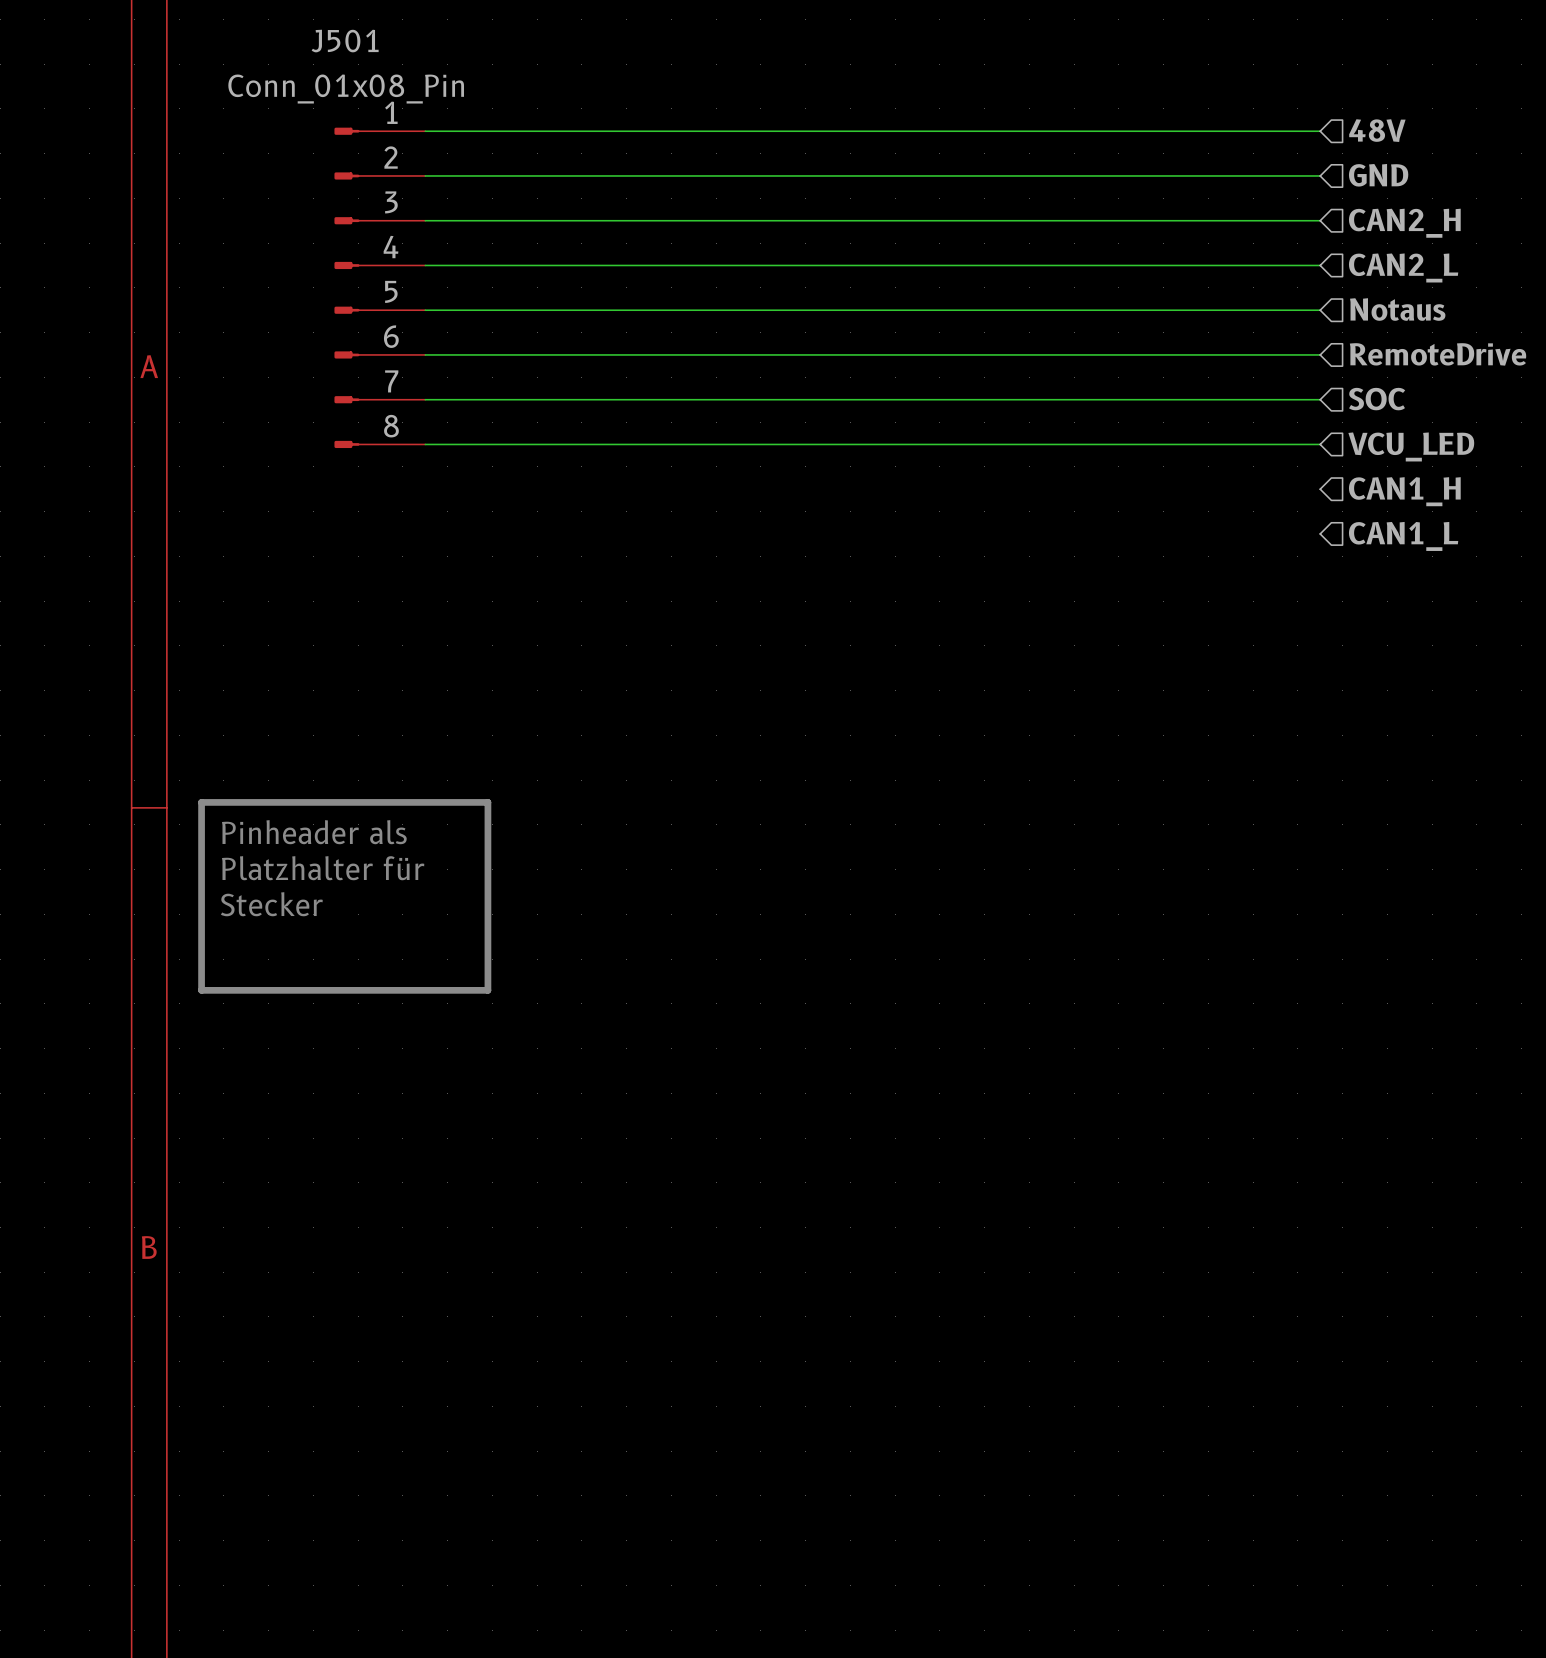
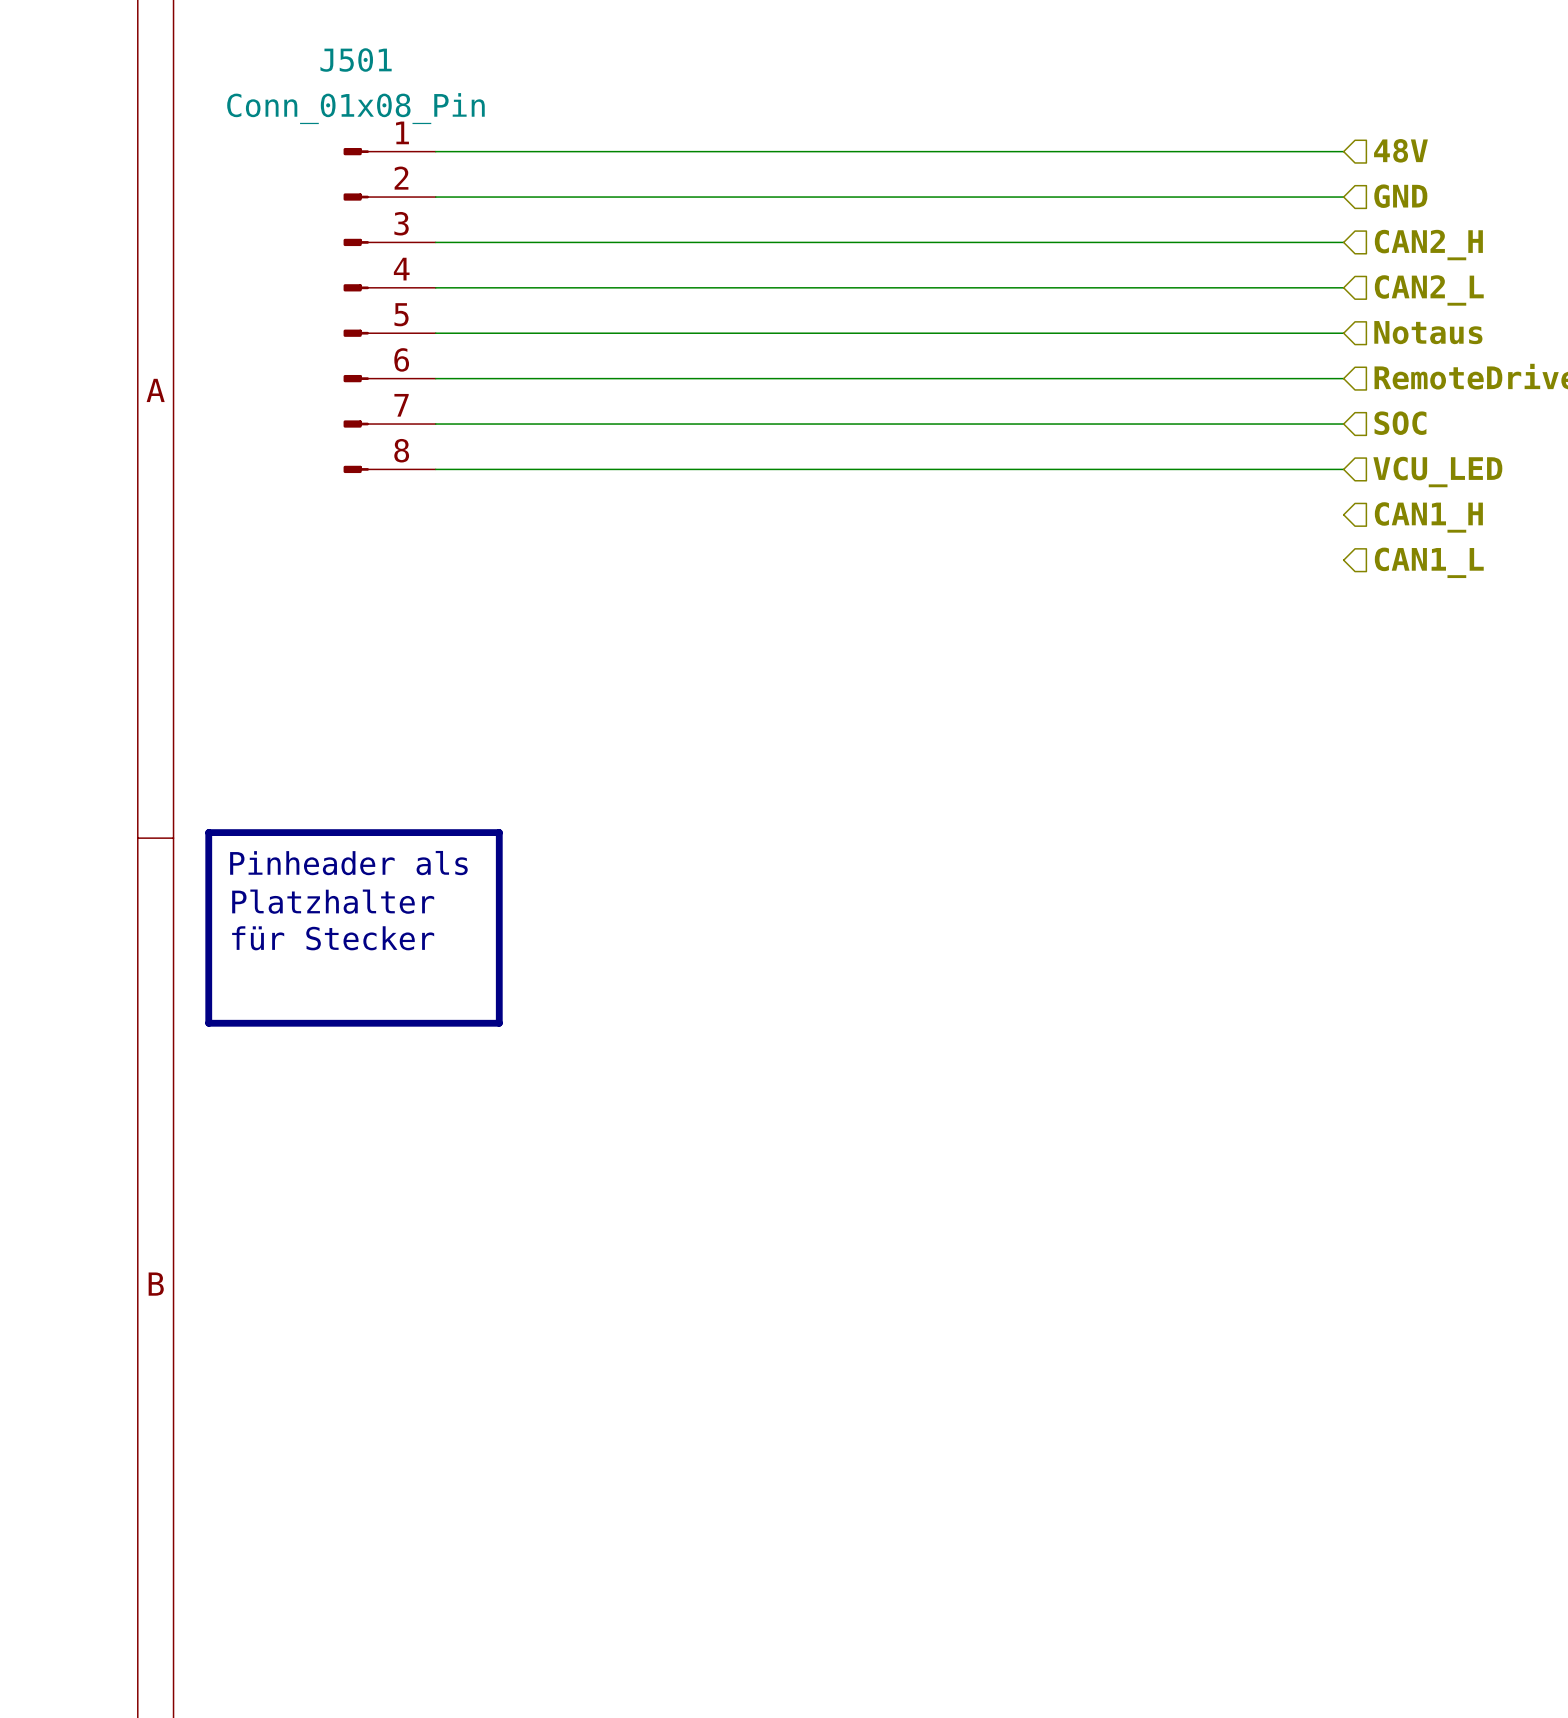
text: Platzhalter für (323, 868) -> Platzhalter (333, 901)
text: Stecker (271, 904) -> für Stecker (333, 938)

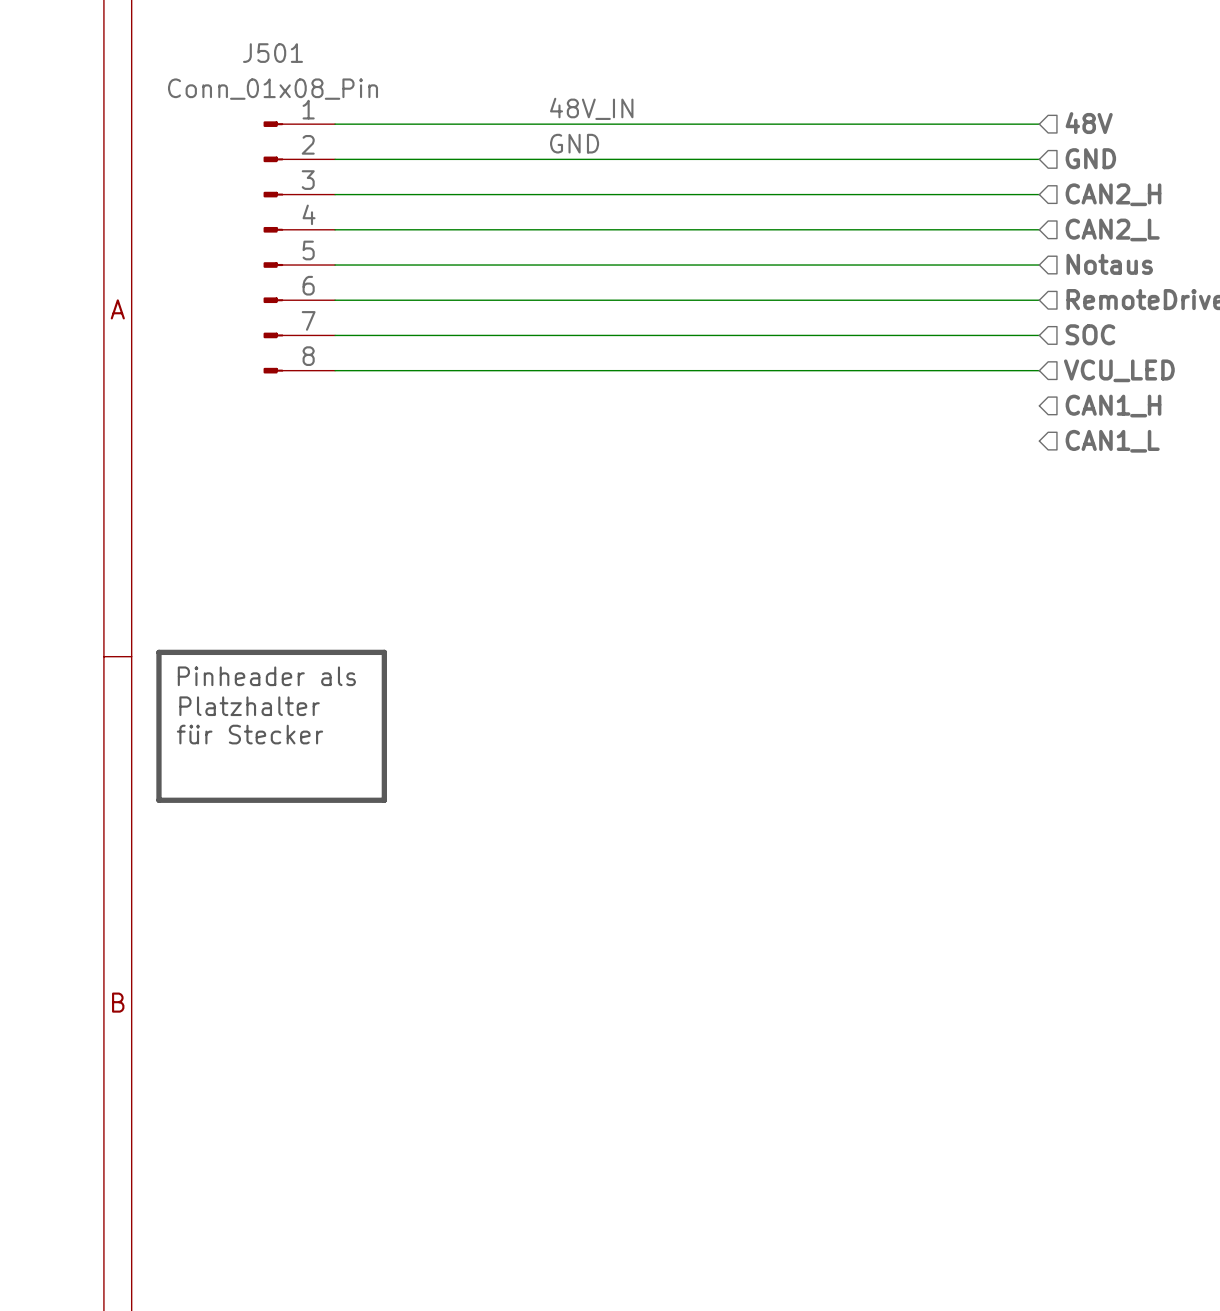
label: none -> 48V_IN (591, 108)
label: none -> GND (574, 143)

